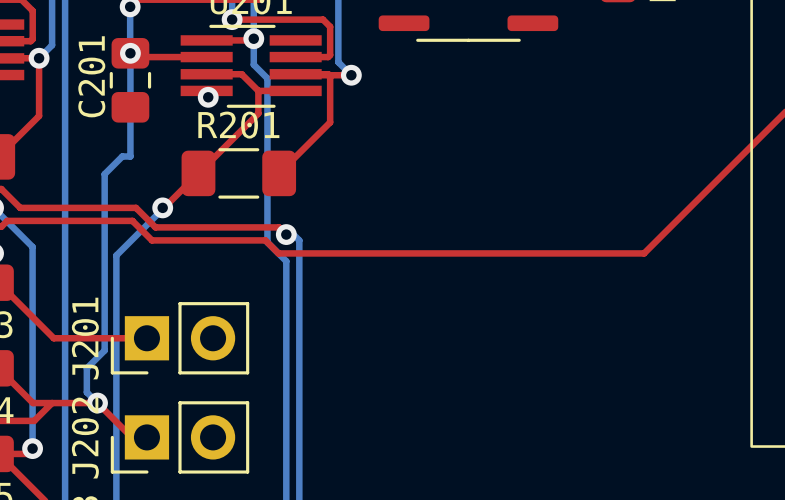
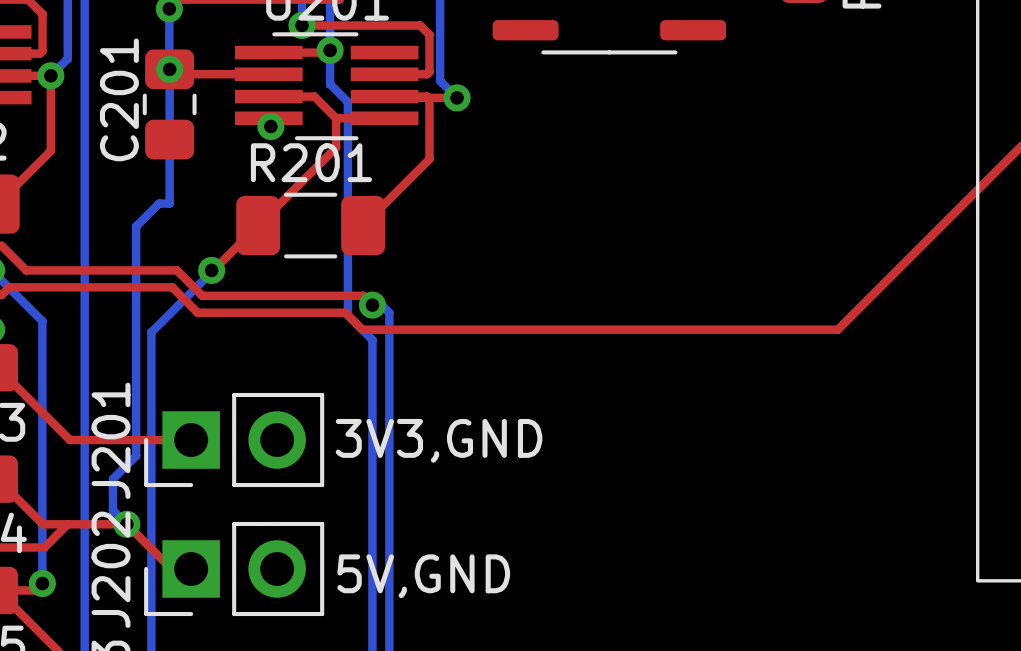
text: none -> 3V3,GND (439, 440)
text: none -> 5V,GND (423, 576)

